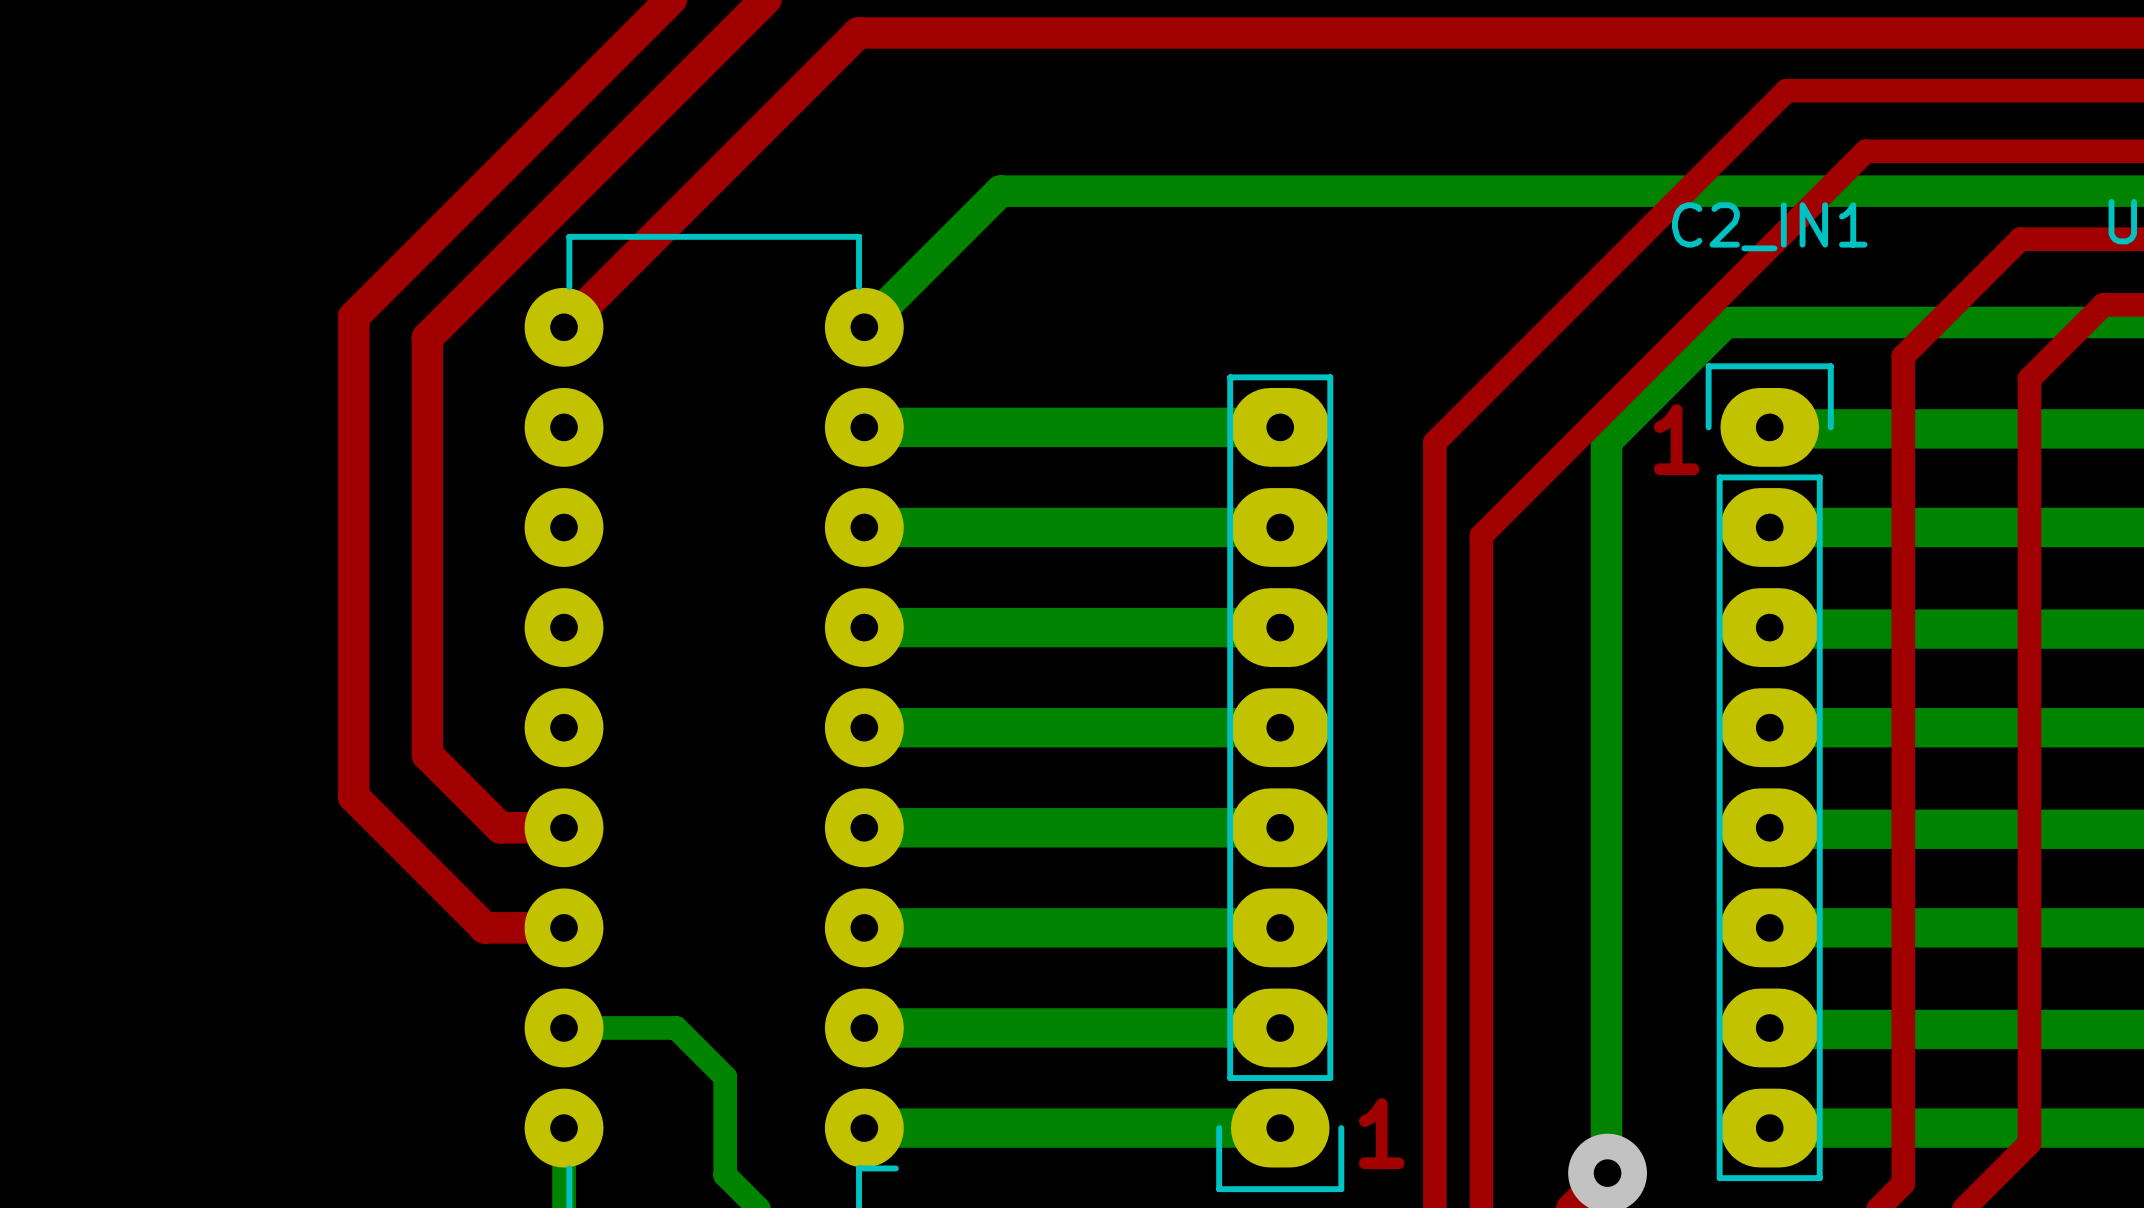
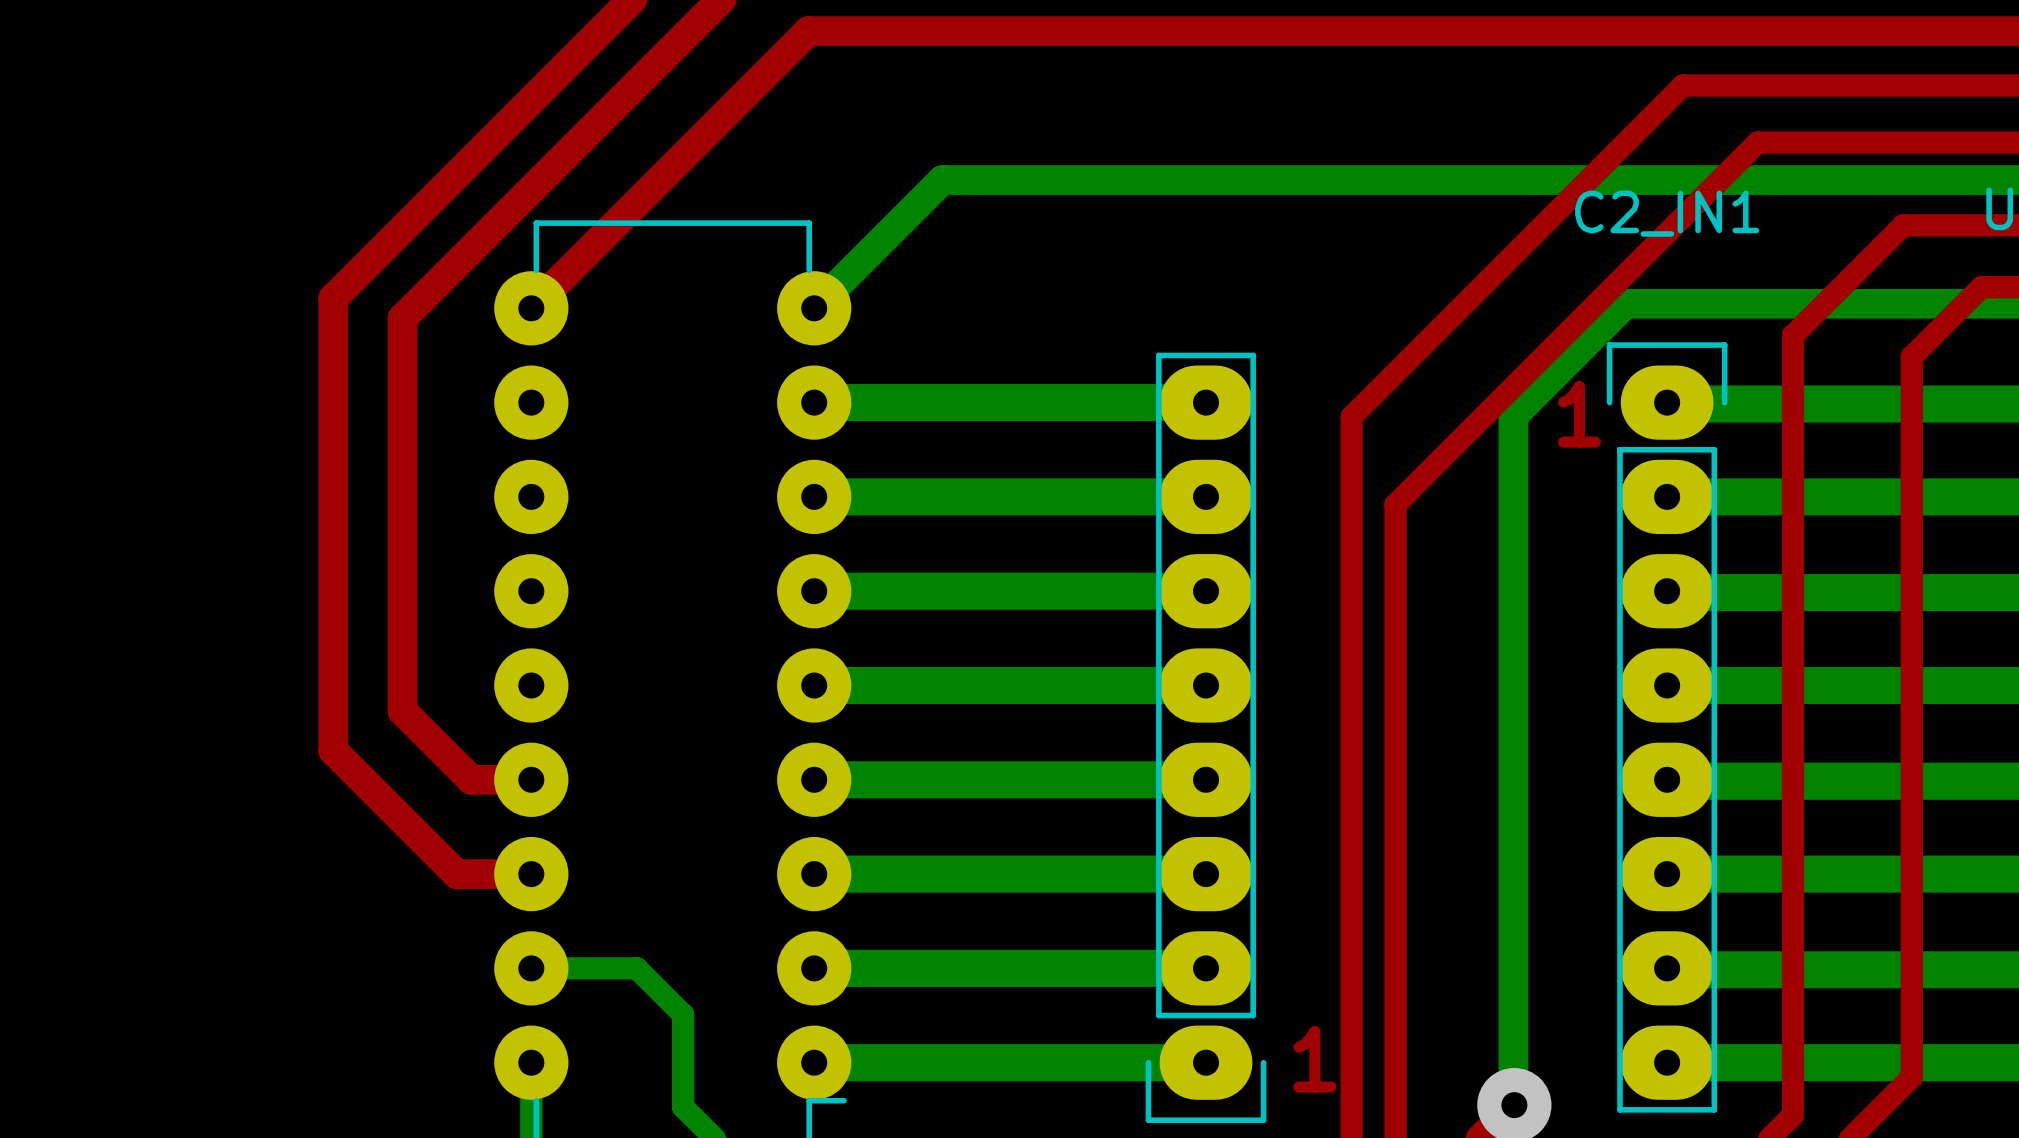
text position: 1 (1381, 1133) -> 1 (1314, 1059)

